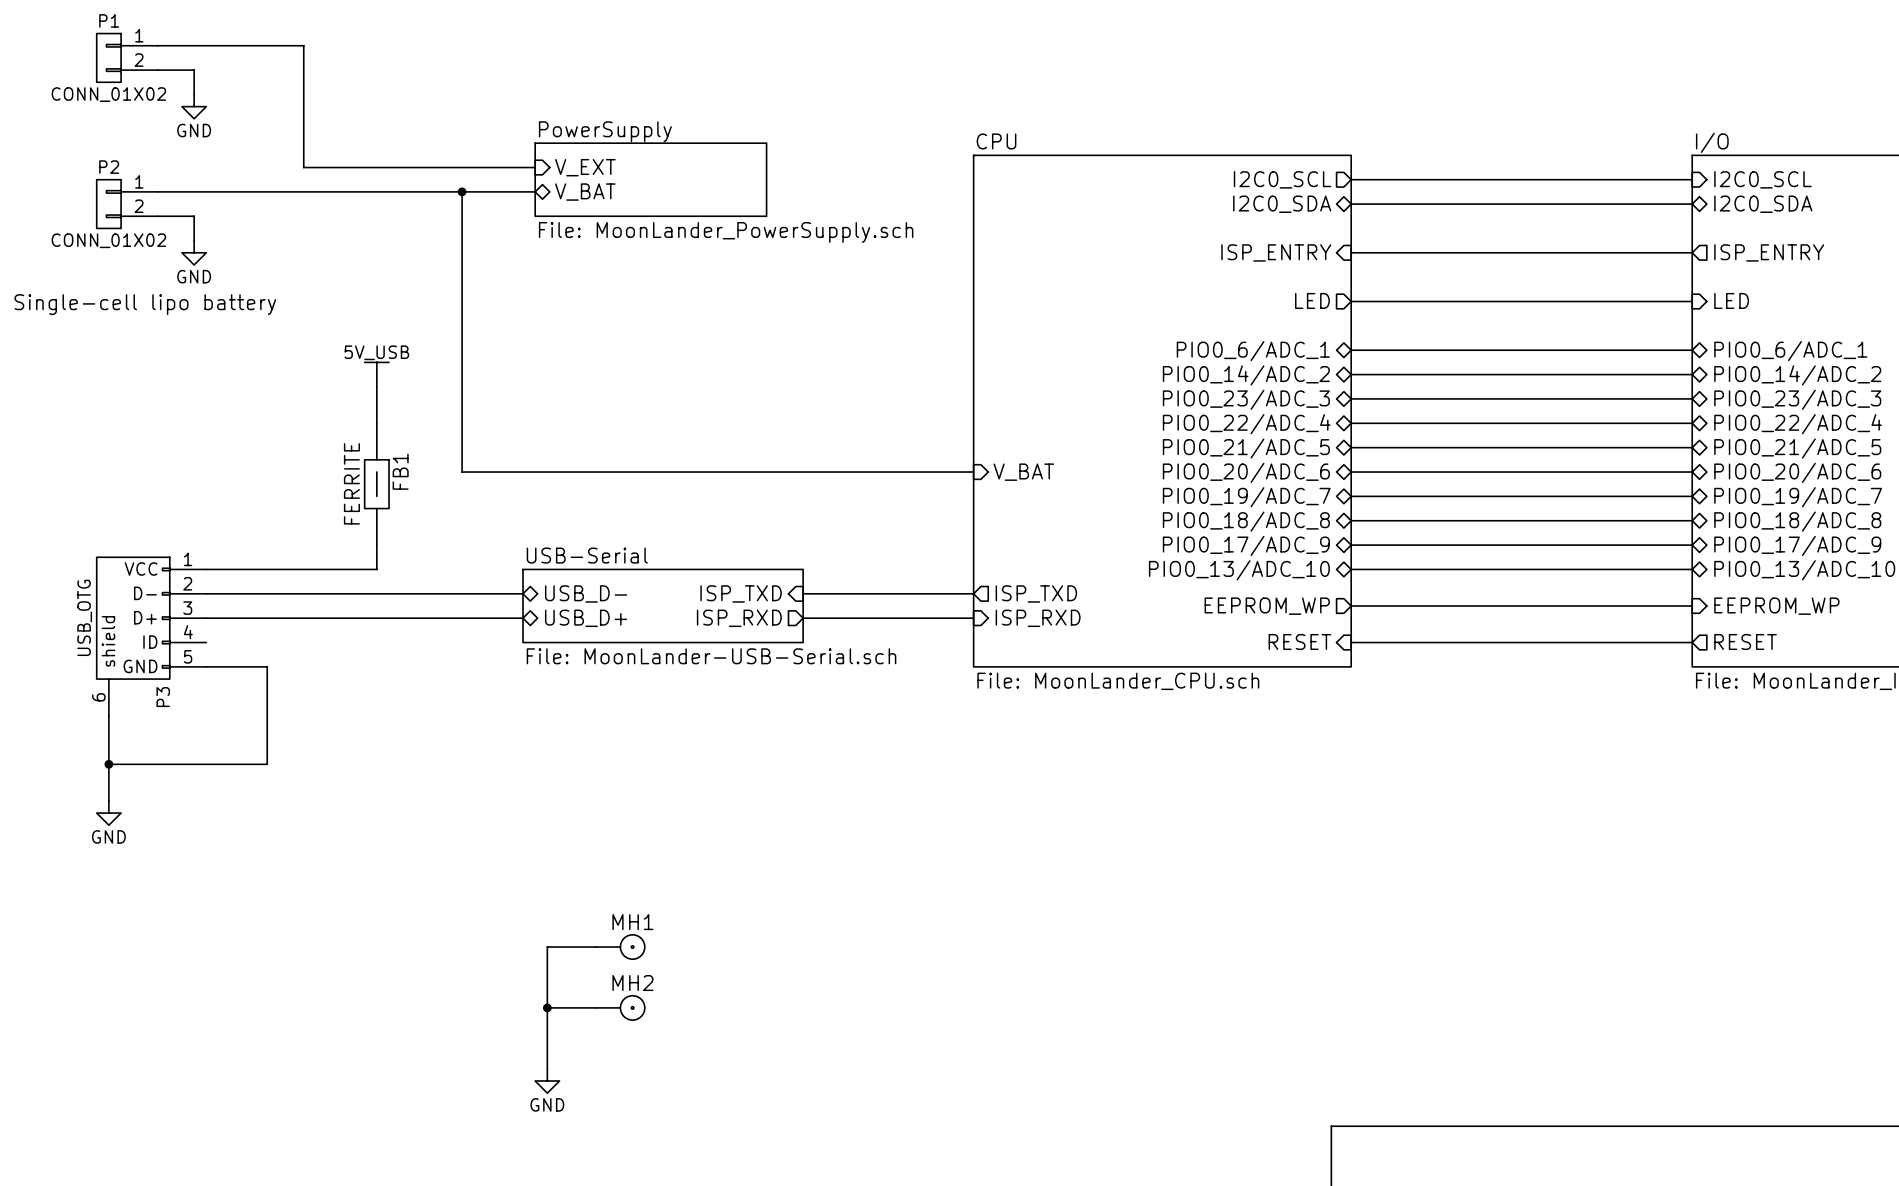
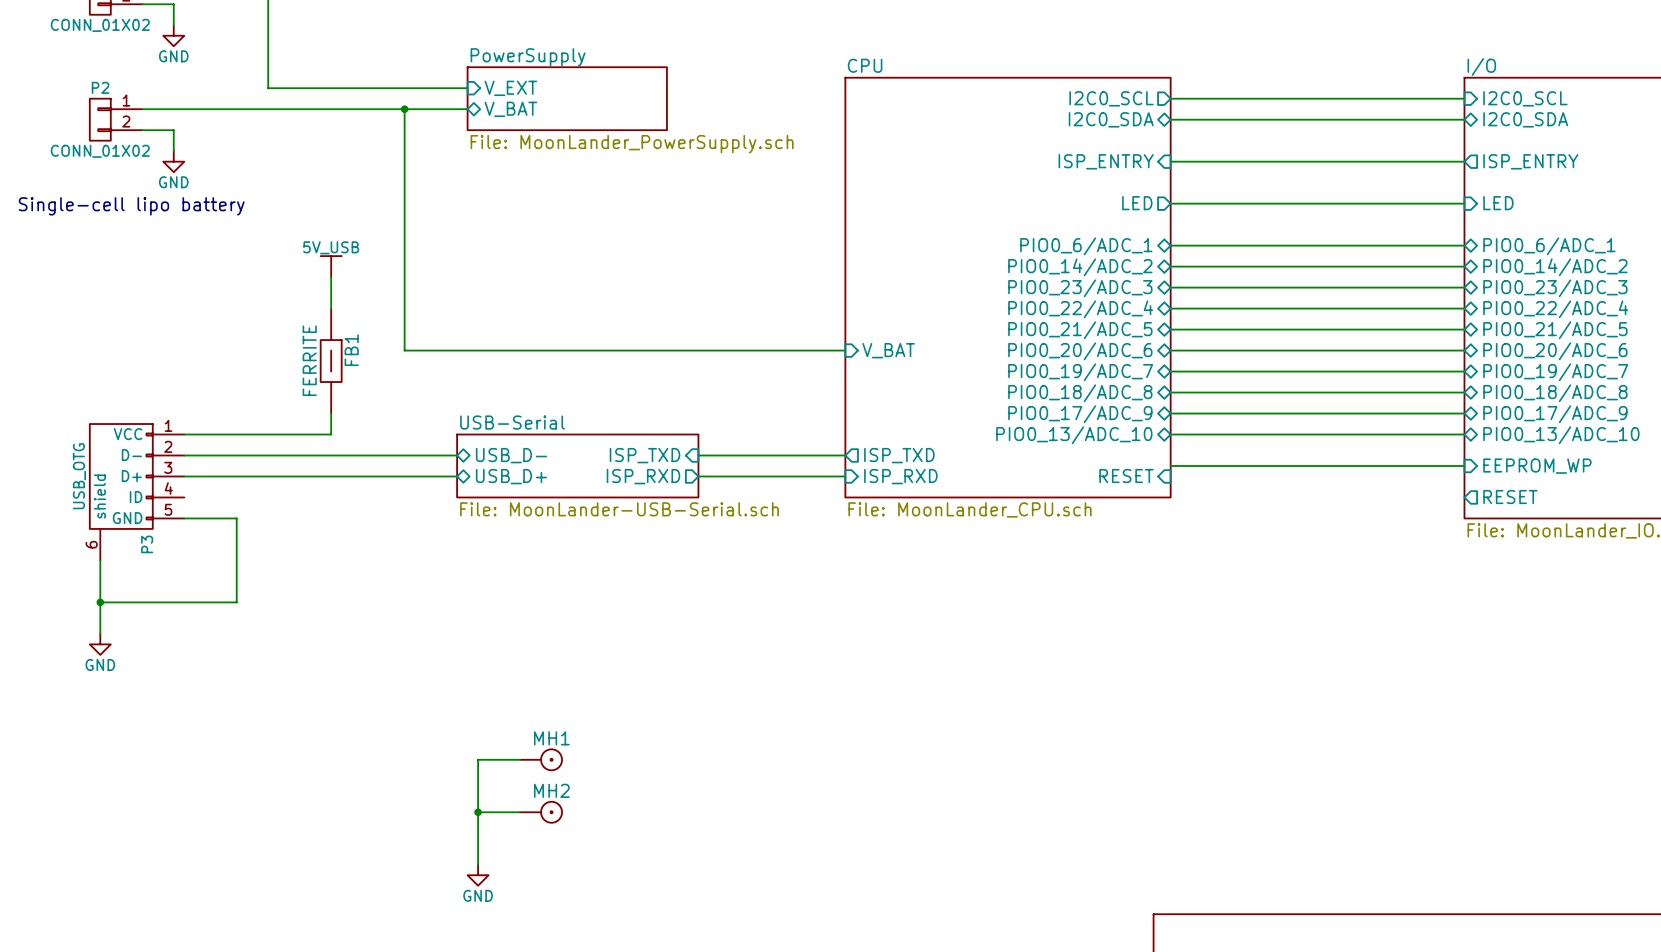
sheet CPU: none -> File: MoonLander_CPU.sch (1008, 287)
sheet CPU: File: MoonLander_CPU.sch (1162, 411) -> none
sheet pin: EEPROM_WP (1267, 606) -> none
sheet pin position: RESET (1299, 641) -> RESET (1126, 476)
wire: (1351, 642) (1692, 642) -> none

